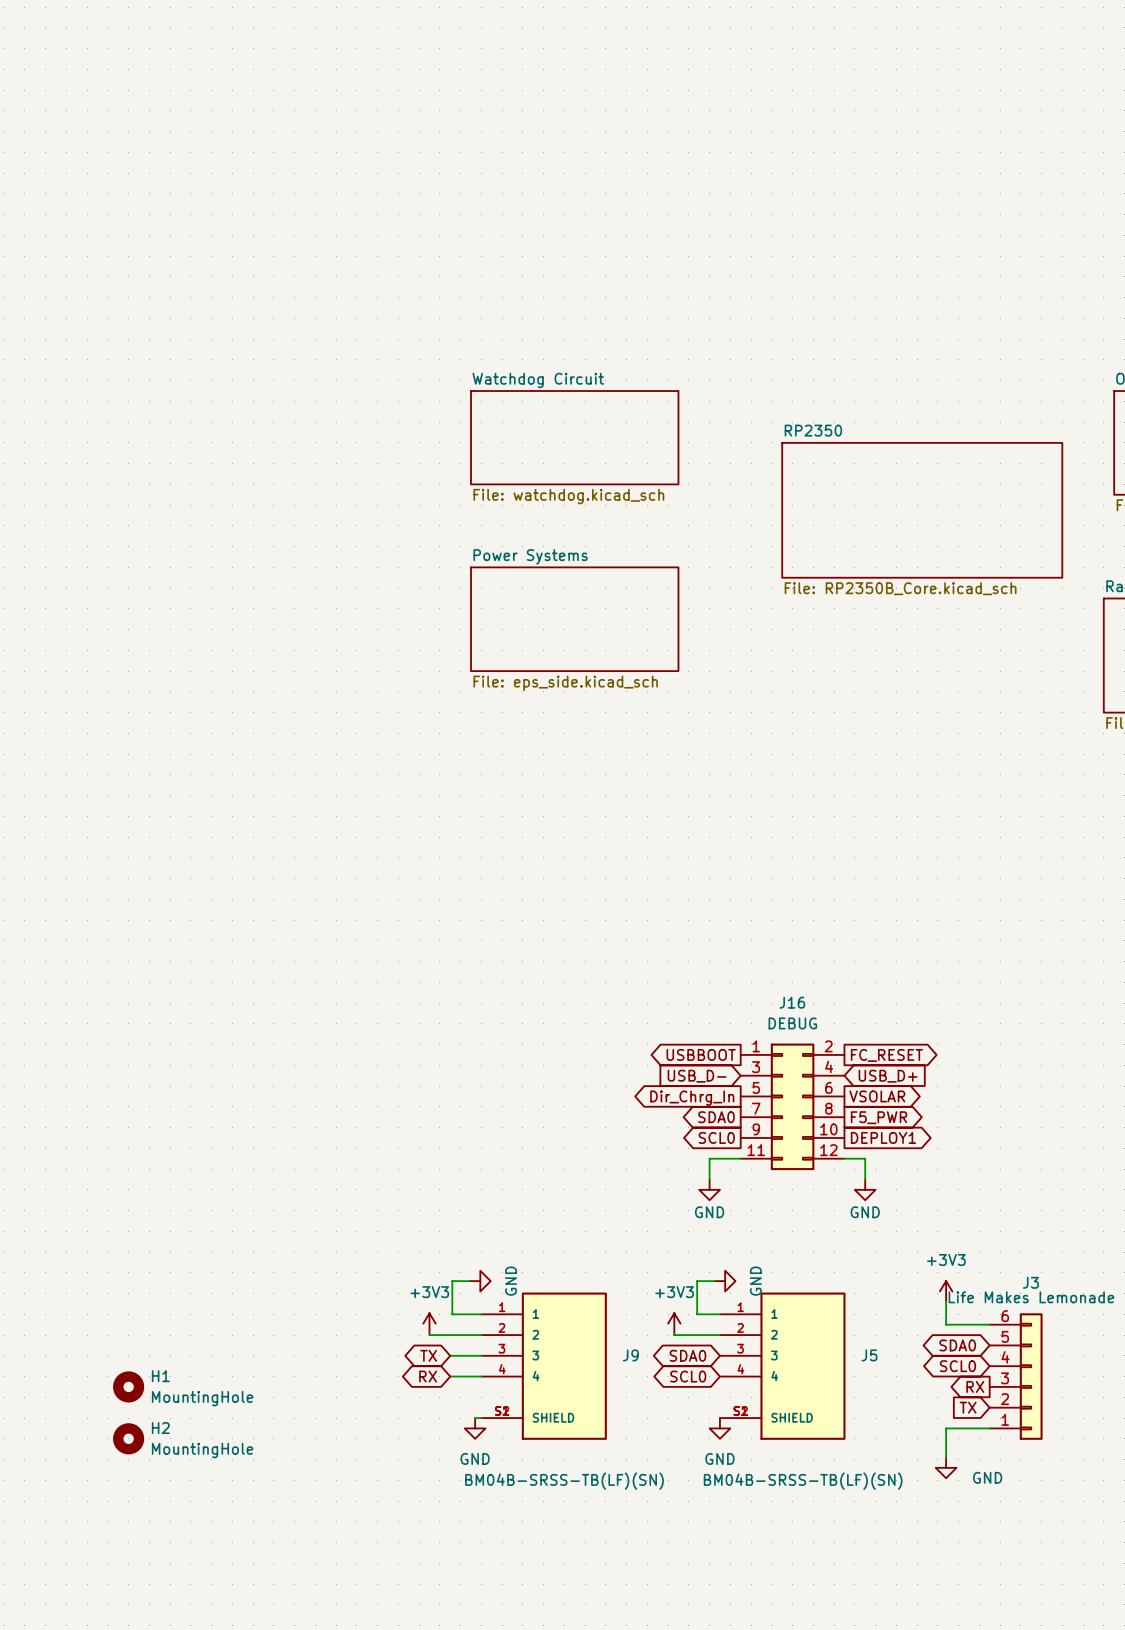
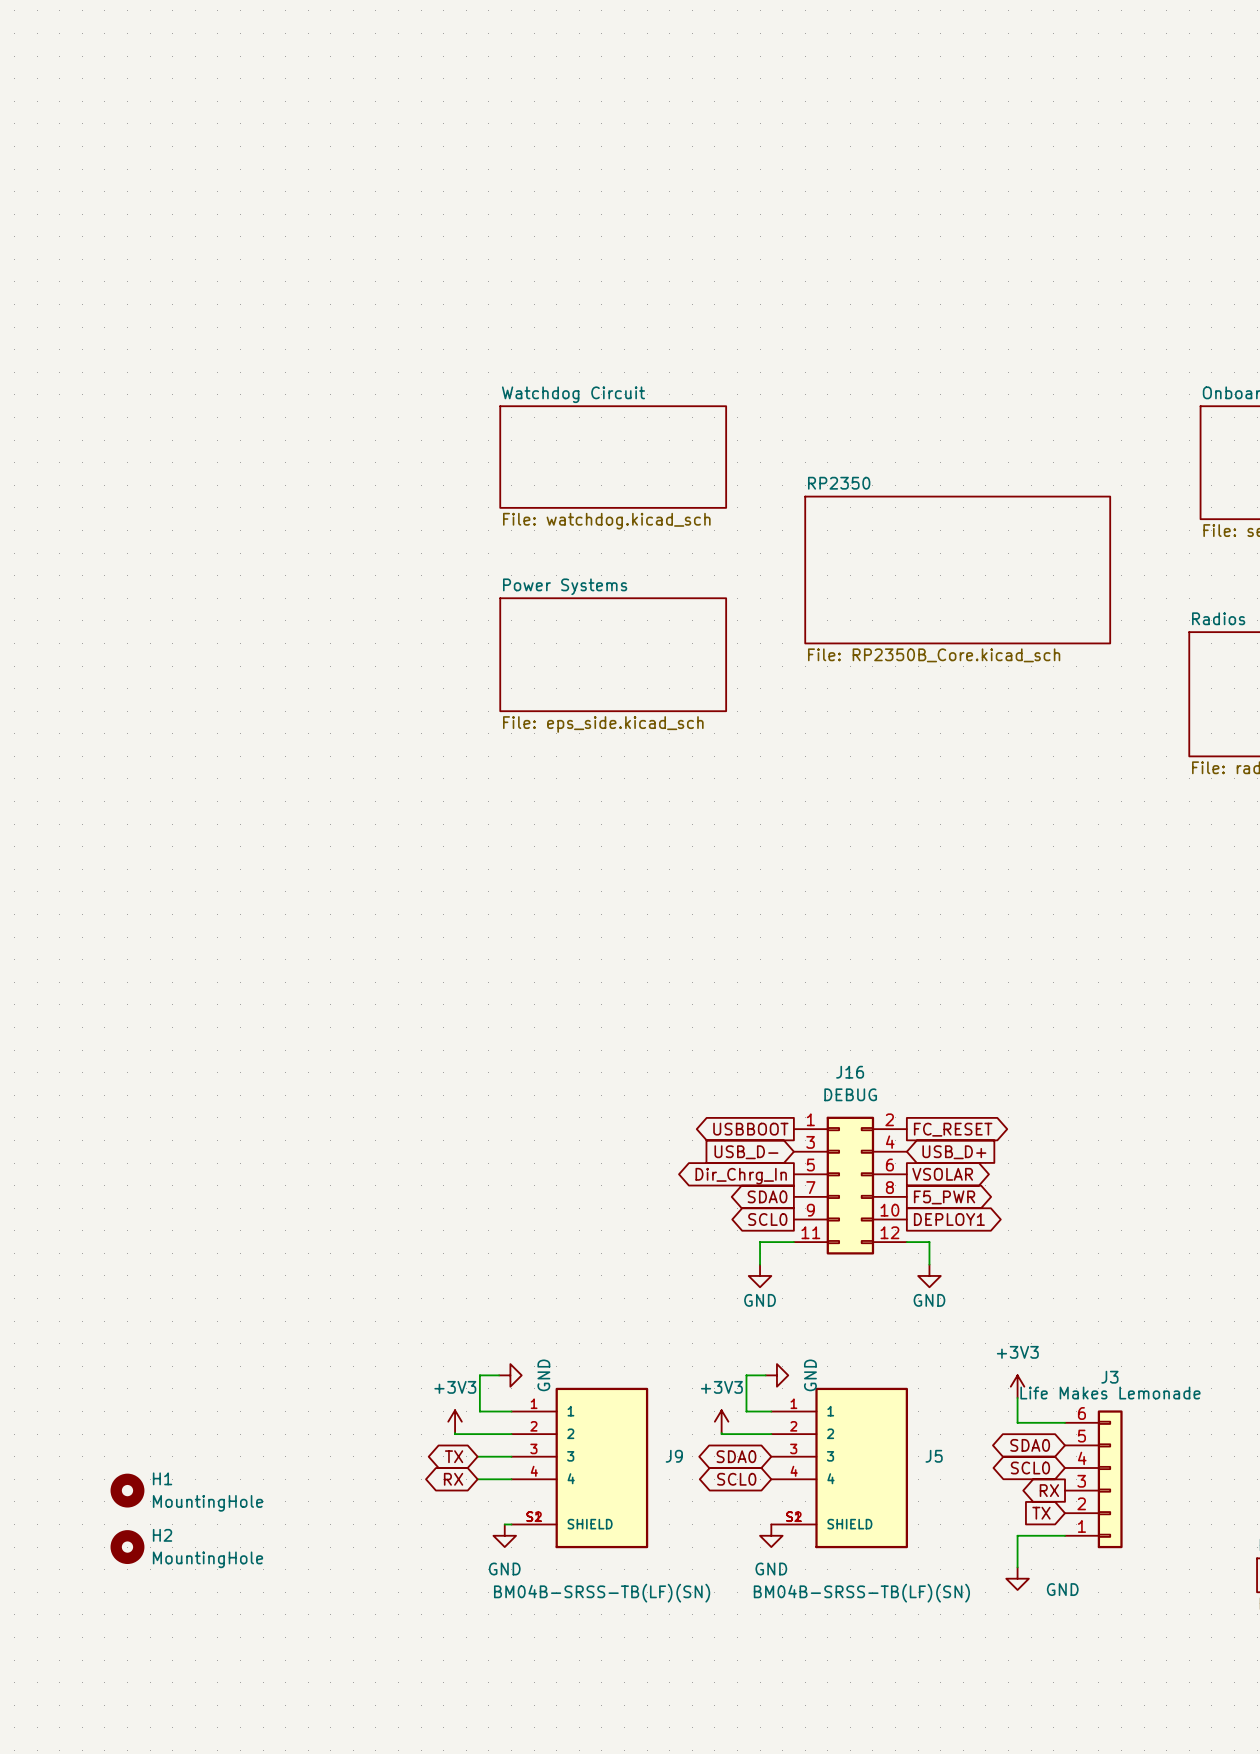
sheet RP2350 position: (922, 510) -> (957, 570)

